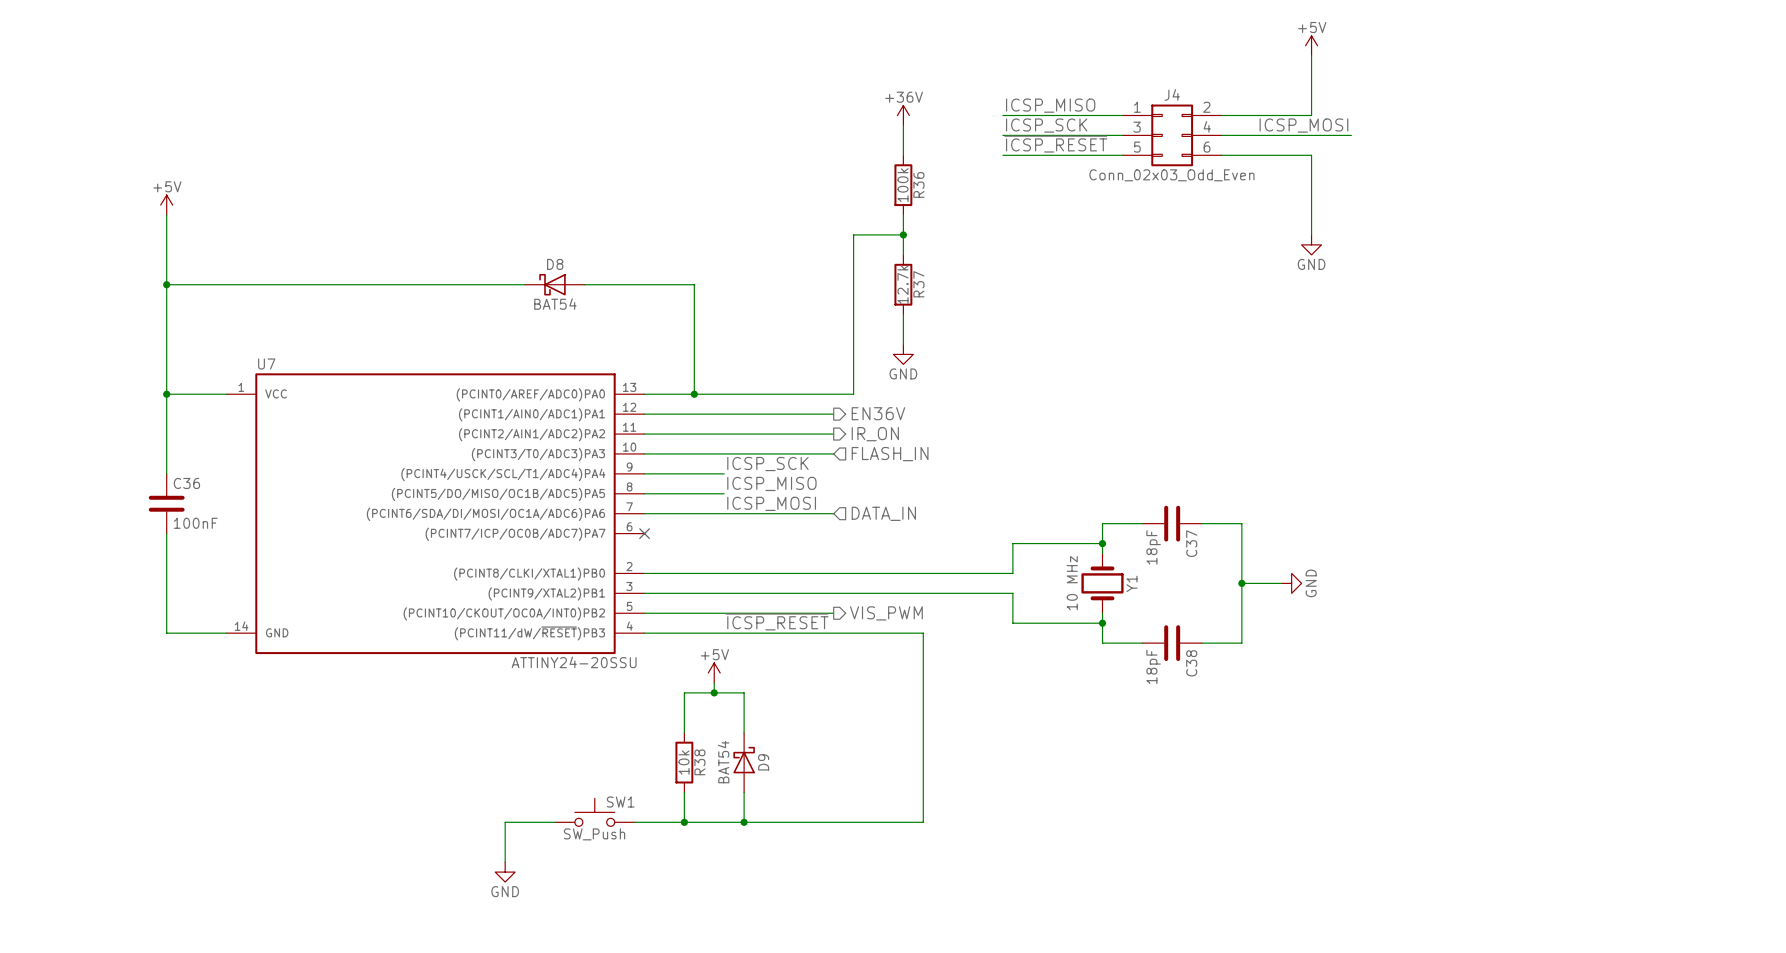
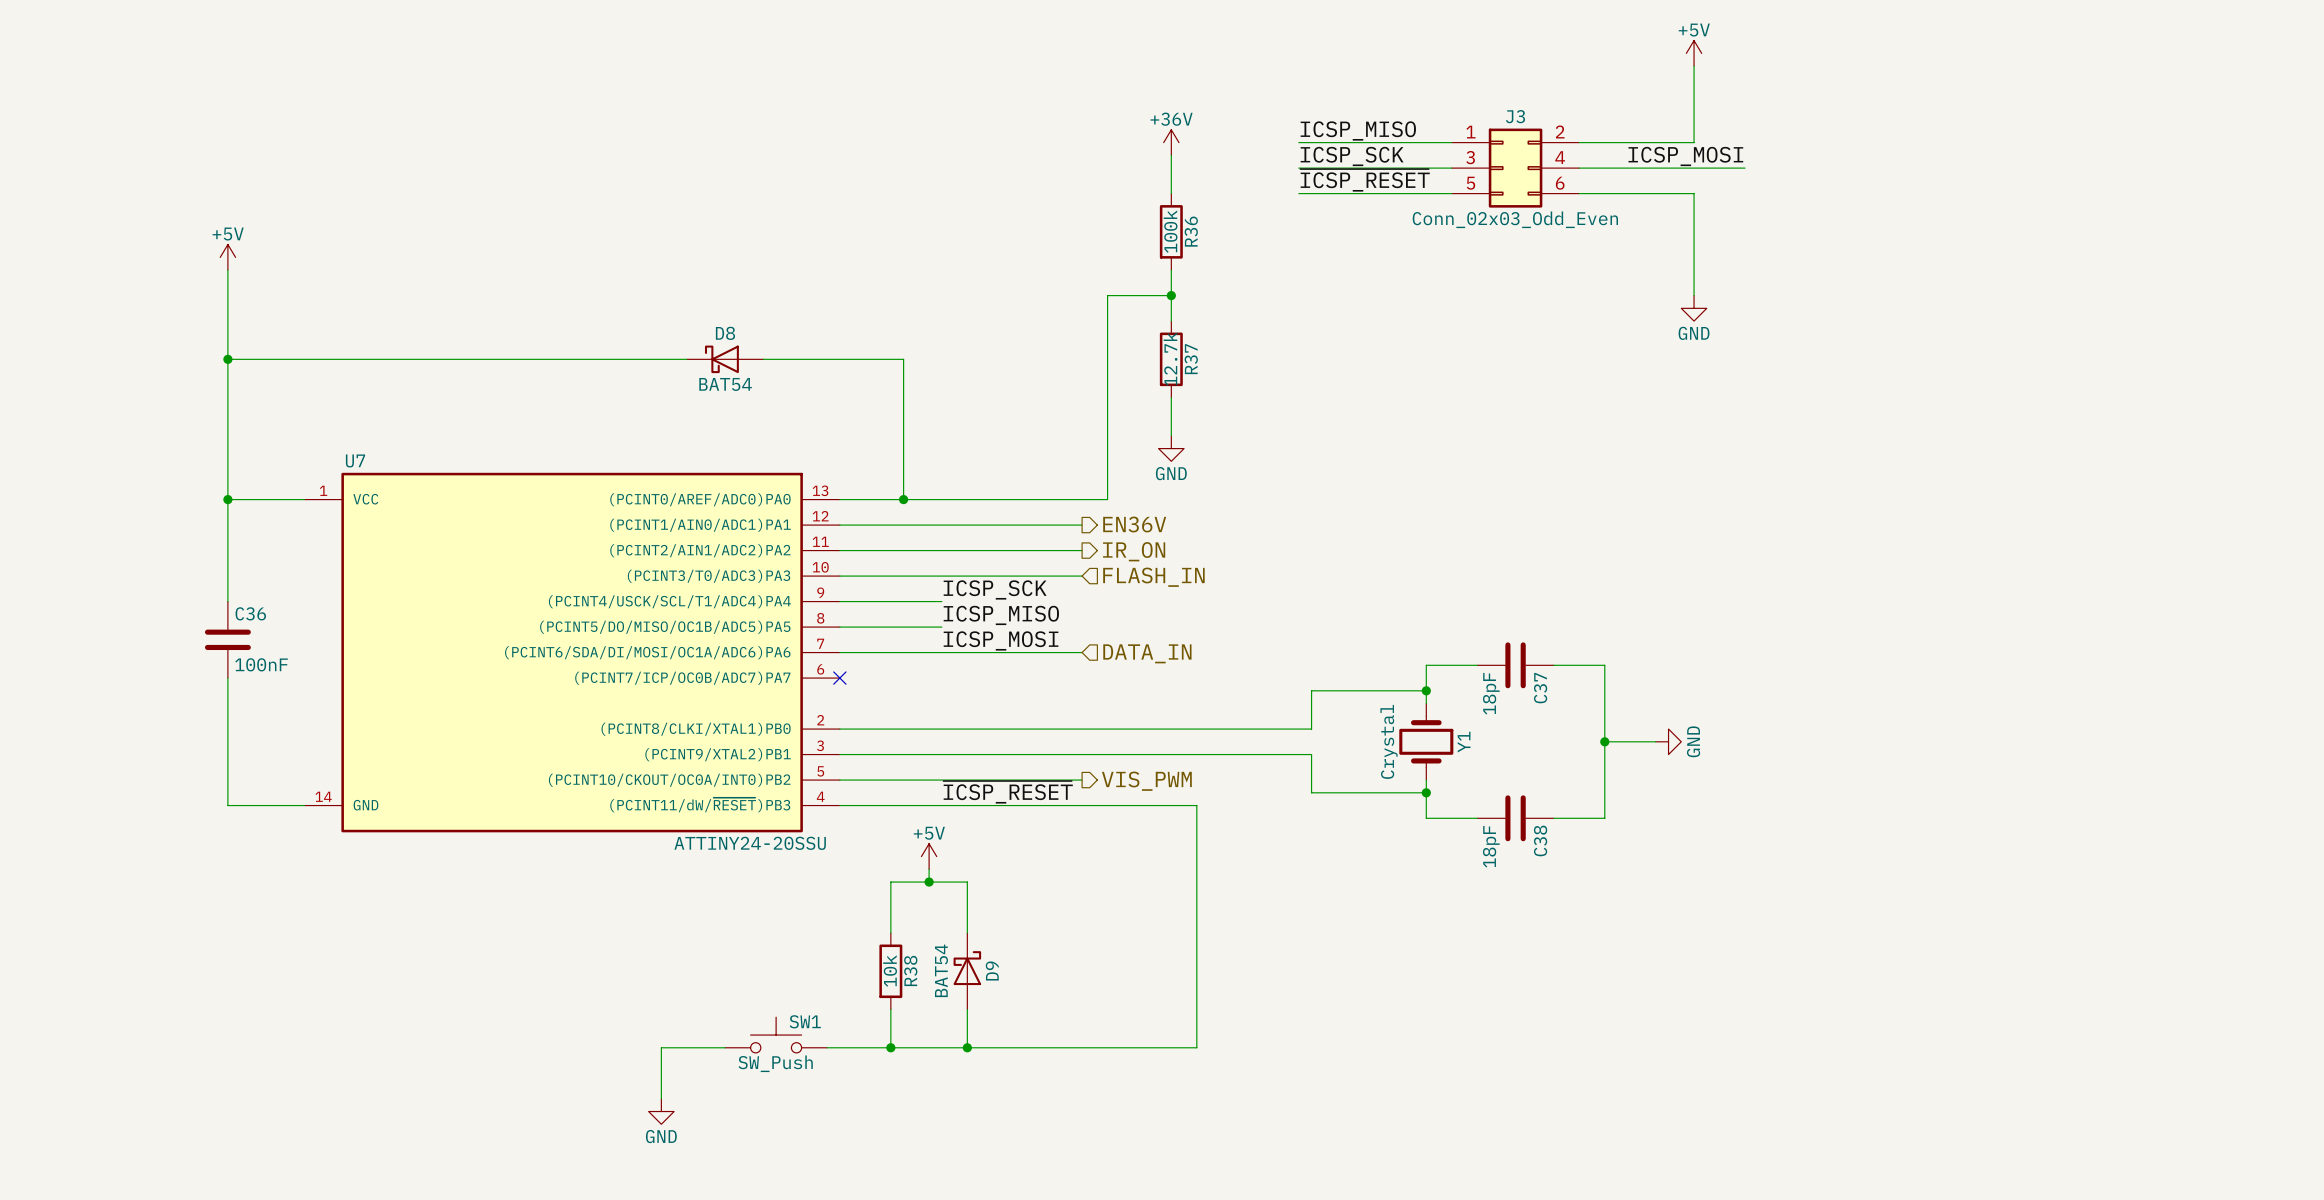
J4 name: J4 (1172, 94) -> J3 (1515, 116)
Y1 value: 10 MHz (1072, 583) -> Crystal (1389, 741)

